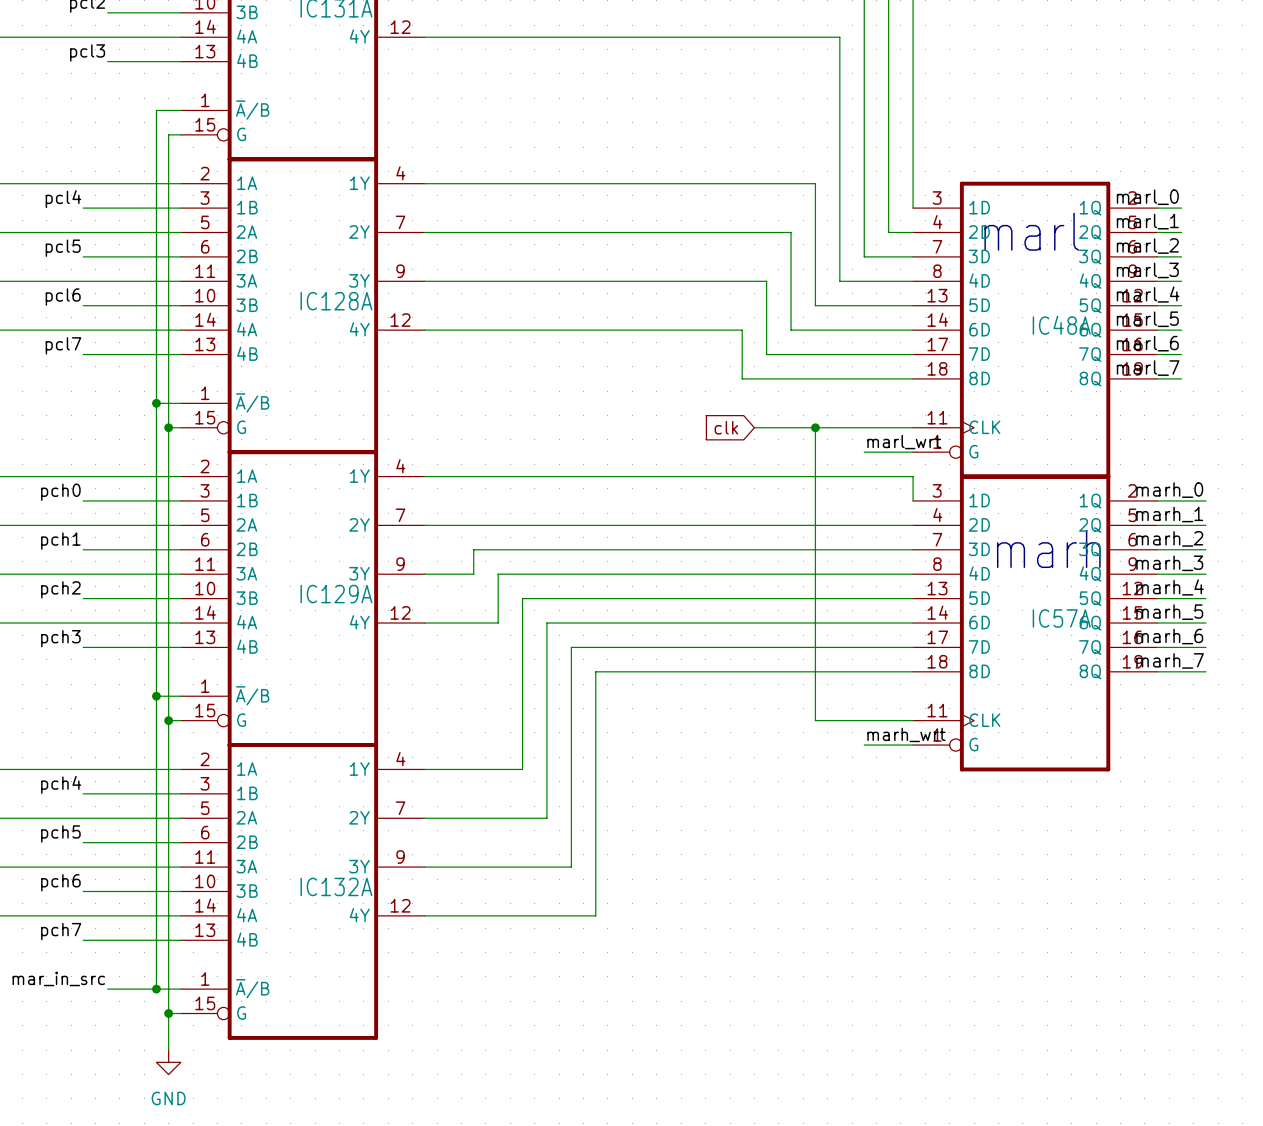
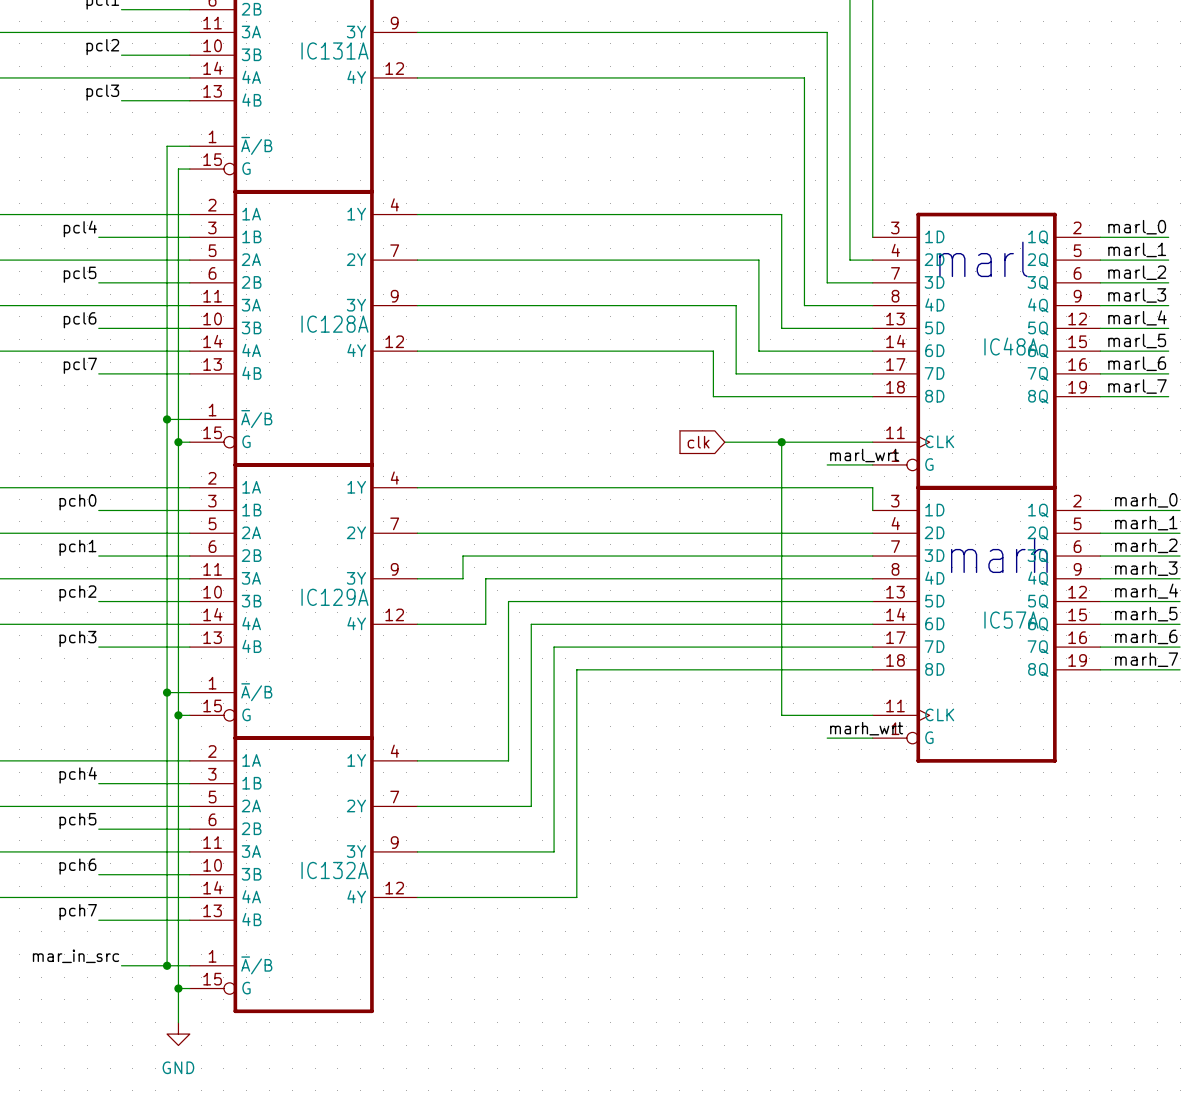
label position: marl_0 (1147, 197) -> marl_0 (1137, 227)
wire: none -> (1123, 237) (1168, 237)
label position: marl_1 (1147, 221) -> marl_1 (1137, 249)
wire: none -> (1123, 260) (1168, 260)
label position: marl_2 (1147, 246) -> marl_2 (1137, 272)
wire: none -> (1123, 282) (1168, 282)
label position: marl_3 (1147, 270) -> marl_3 (1137, 295)
wire: none -> (1123, 305) (1168, 305)
label position: marl_4 (1148, 294) -> marl_4 (1137, 317)
wire: none -> (1123, 328) (1168, 328)
label position: marl_5 (1147, 319) -> marl_5 (1137, 340)
wire: none -> (1123, 351) (1168, 351)
label position: marl_6 (1147, 343) -> marl_6 (1137, 363)
wire: none -> (1123, 373) (1168, 373)
label position: marl_7 (1148, 368) -> marl_7 (1137, 386)
wire: none -> (1123, 396) (1168, 396)
label position: marh_0 (1169, 490) -> marh_0 (1146, 500)
wire: none -> (1145, 510) (1180, 510)
label position: marh_1 (1169, 514) -> marh_1 (1146, 523)
wire: none -> (1145, 533) (1180, 533)
label position: marh_2 (1169, 538) -> marh_2 (1146, 545)
wire: none -> (1145, 556) (1180, 556)
label position: marh_3 (1169, 563) -> marh_3 (1146, 568)
wire: none -> (1145, 578) (1180, 578)
label position: marh_4 (1170, 587) -> marh_4 (1146, 591)
wire: none -> (1145, 601) (1180, 601)
label position: marh_5 (1169, 612) -> marh_5 (1146, 614)
wire: none -> (1145, 624) (1180, 624)
label position: marh_6 (1169, 636) -> marh_6 (1146, 636)
wire: none -> (1145, 647) (1180, 647)
label position: marh_7 (1170, 660) -> marh_7 (1146, 659)
wire: none -> (1145, 669) (1180, 669)

